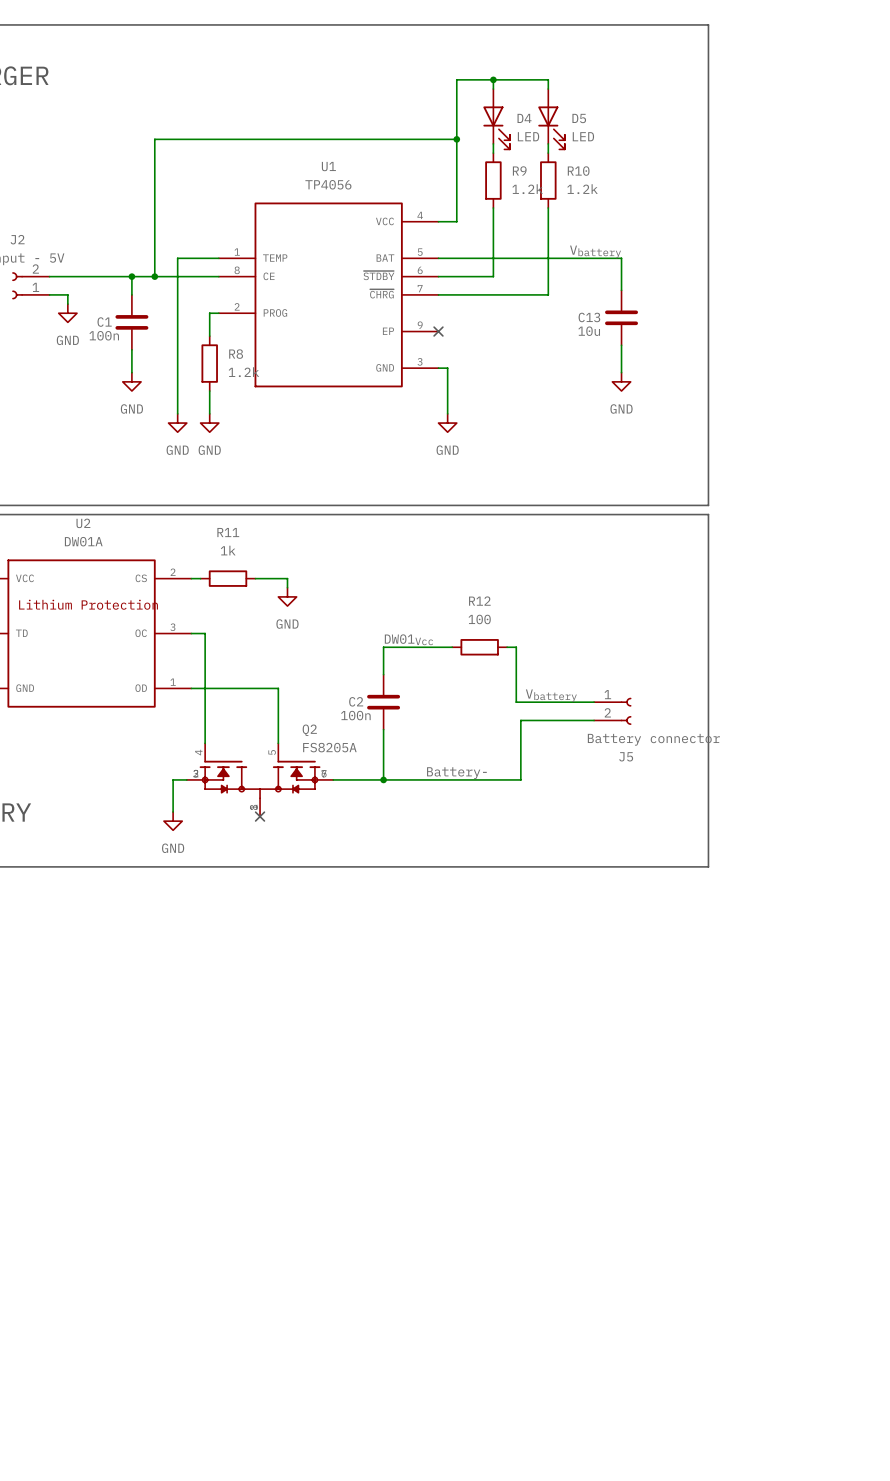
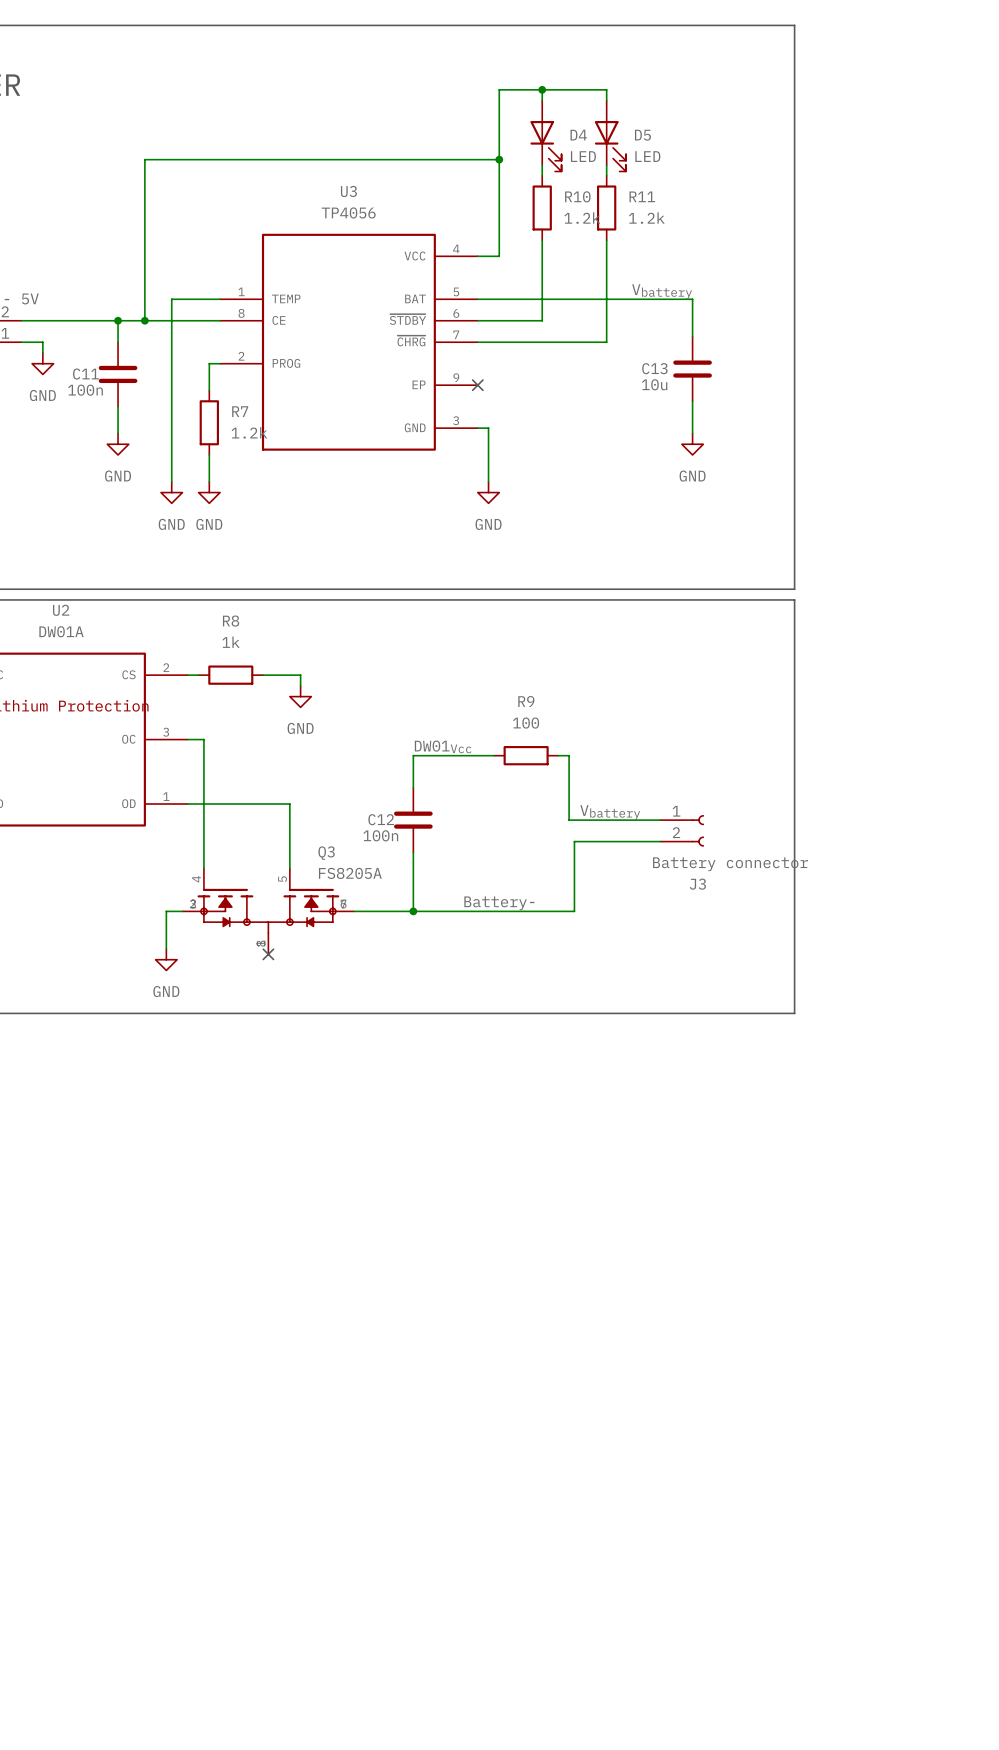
U1 name: U1 (328, 166) -> U3 (348, 191)
R9 name: R9 (519, 170) -> R10 (577, 196)
R10 name: R10 (578, 171) -> R11 (642, 196)
C1 name: C1 (104, 322) -> C11 (85, 374)
R8 name: R8 (236, 354) -> R7 (240, 411)
R11 name: R11 (228, 532) -> R8 (231, 621)
R12 name: R12 (479, 601) -> R9 (526, 701)
C2 name: C2 (356, 701) -> C12 (381, 819)
Q2 name: Q2 (309, 730) -> Q3 (326, 853)
J5 name: J5 (626, 756) -> J3 (697, 884)

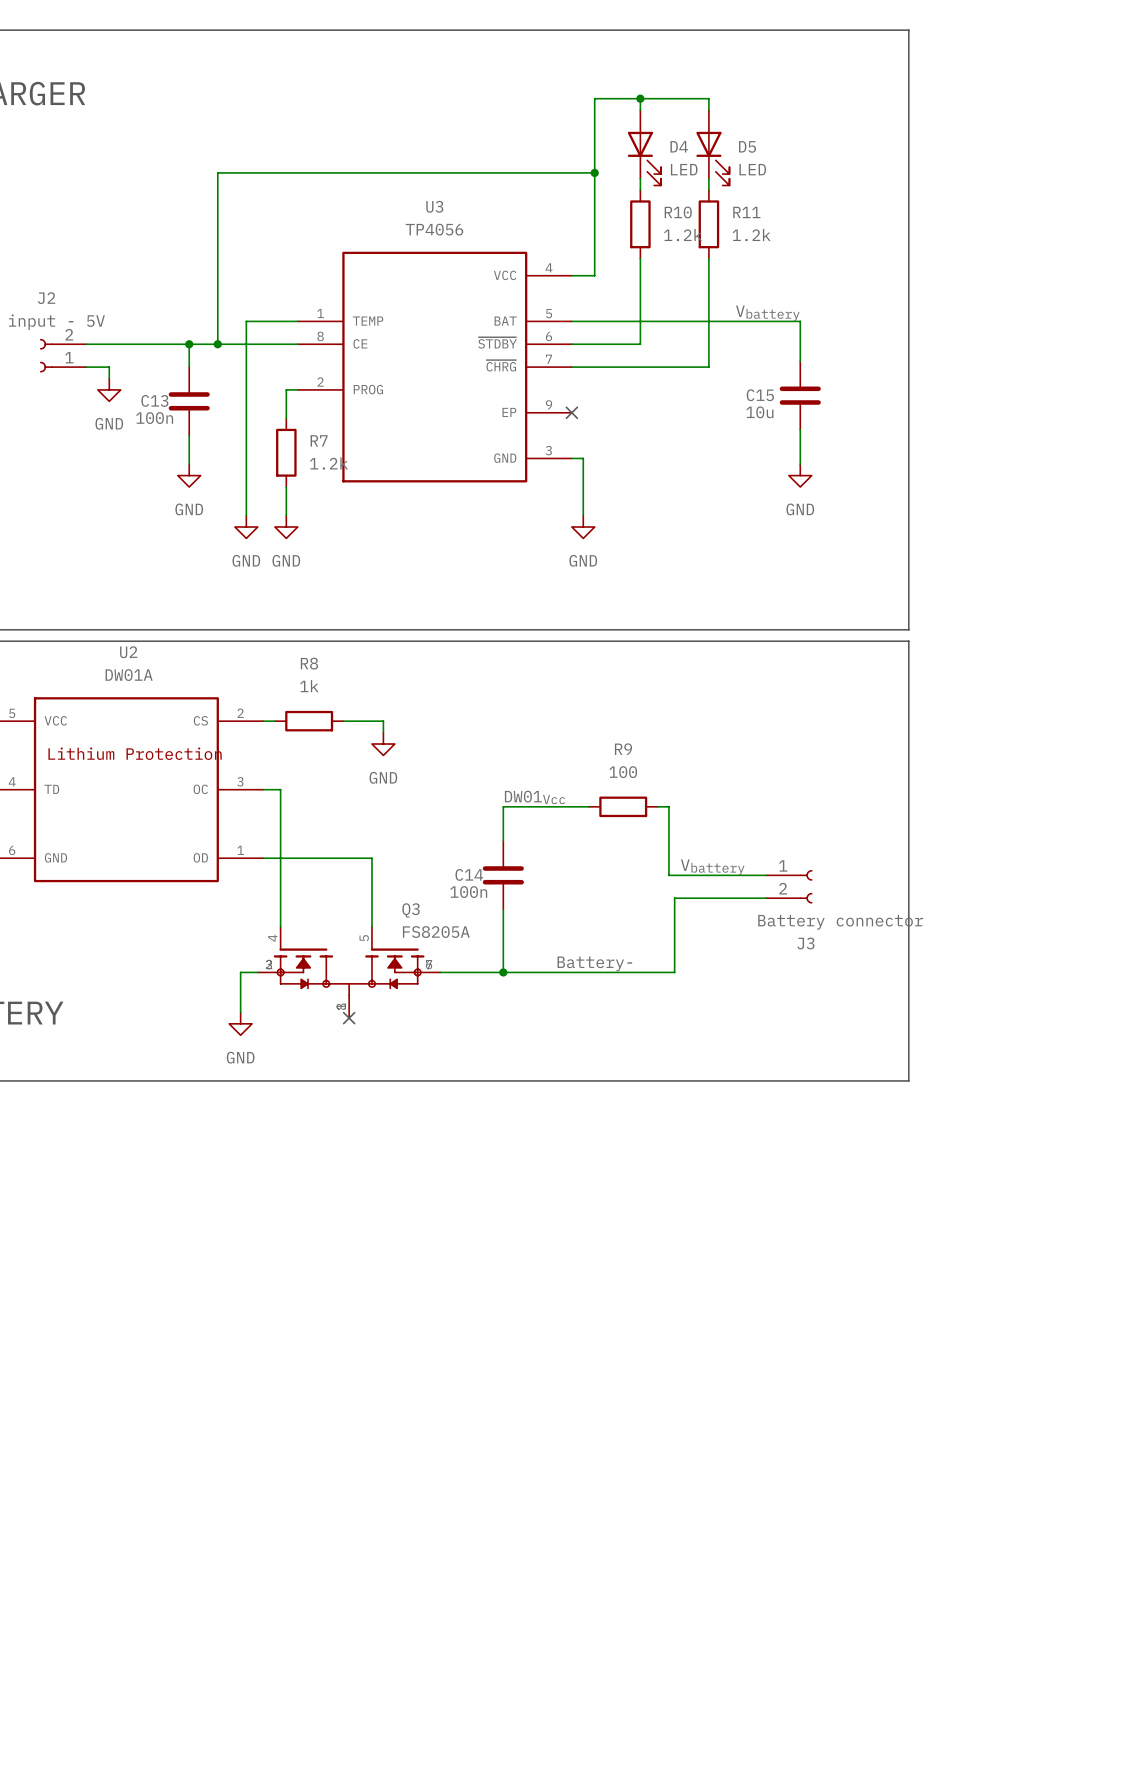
C13 name: C13 (654, 368) -> C15 (760, 395)
C11 name: C11 (85, 374) -> C13 (154, 400)
C12 name: C12 (381, 819) -> C14 (469, 874)

